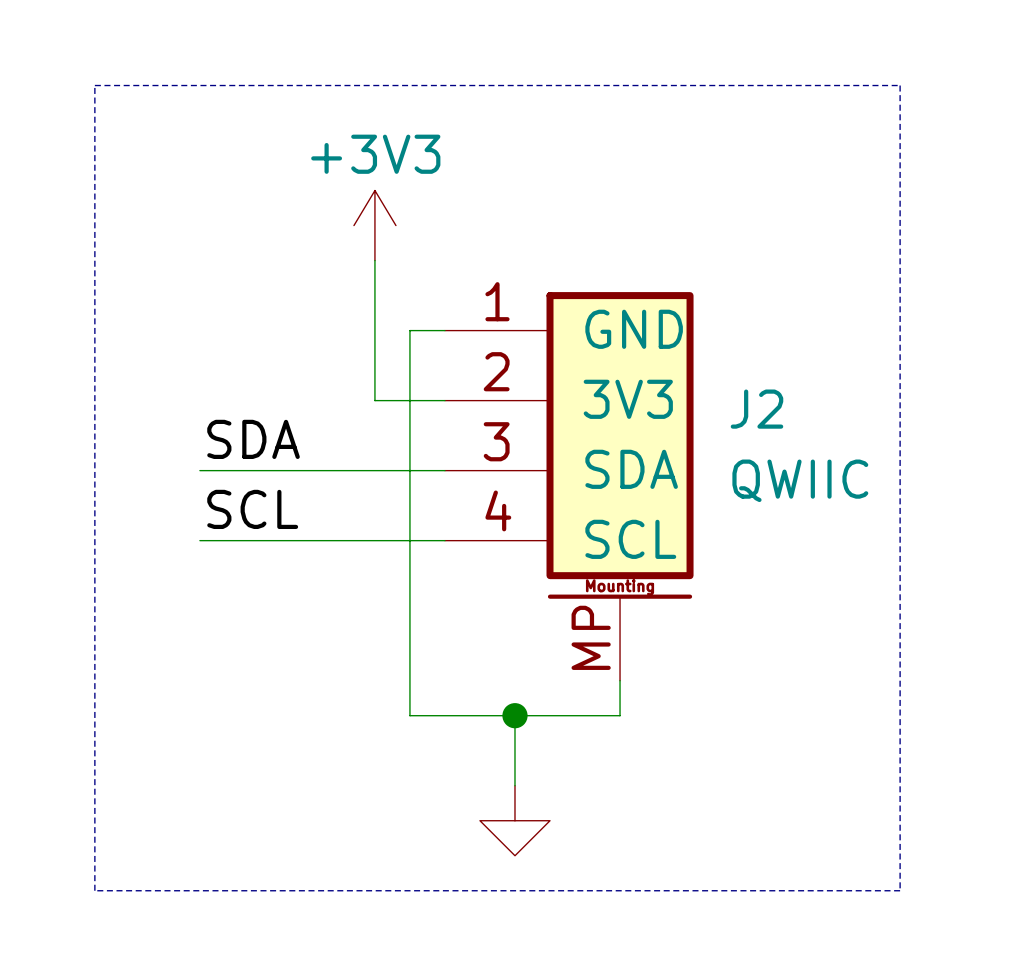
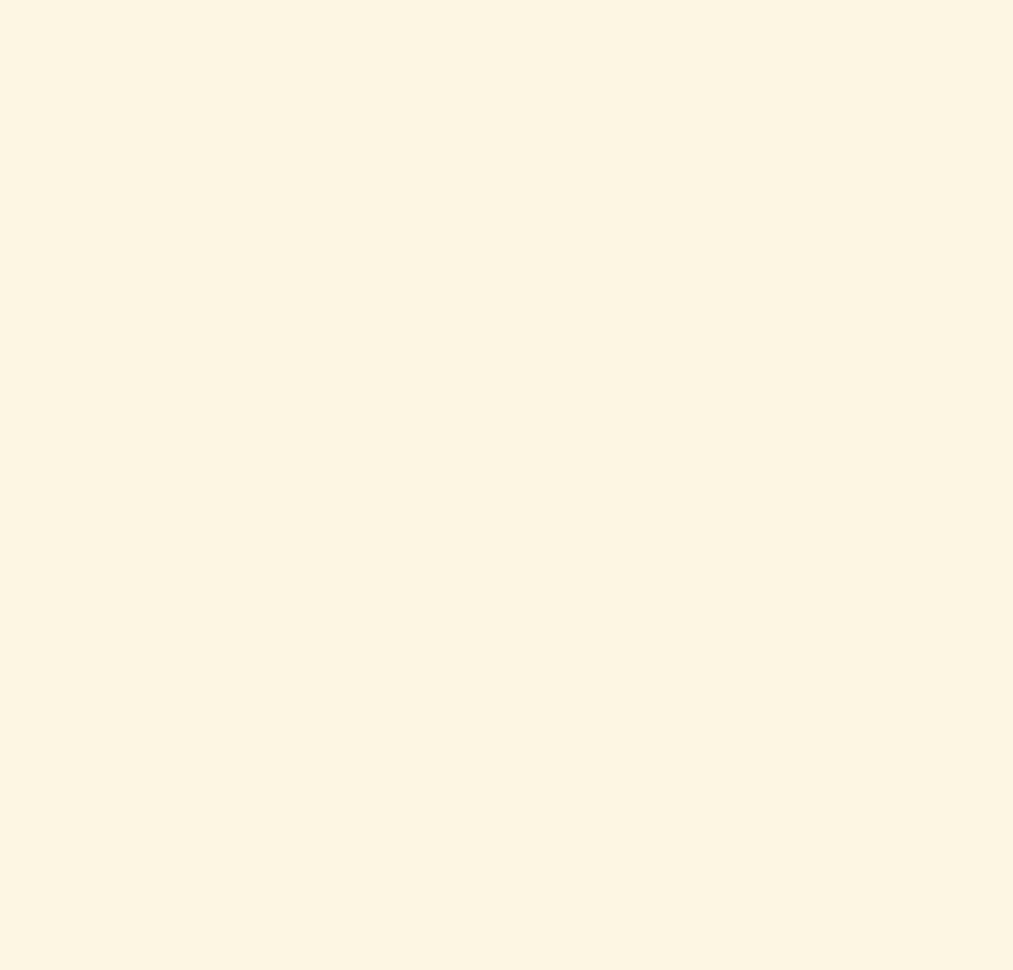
line: (94, 85) (900, 85) (900, 890) (94, 890) (94, 85) -> none
power symbol: +3V3 (374, 225) -> none
wire: (374, 260) (374, 400) (444, 400) -> none
wire: (444, 330) (409, 330) (409, 715) (620, 715) (620, 680) -> none
label: SDA (253, 439) -> none
wire: (199, 470) (444, 470) -> none
J2: QWIIC (569, 486) -> none
label: SCL (252, 509) -> none
wire: (199, 540) (444, 540) -> none
wire: (514, 715) (514, 785) -> none
junction: (514, 715) -> none
power symbol: (514, 820) -> none

